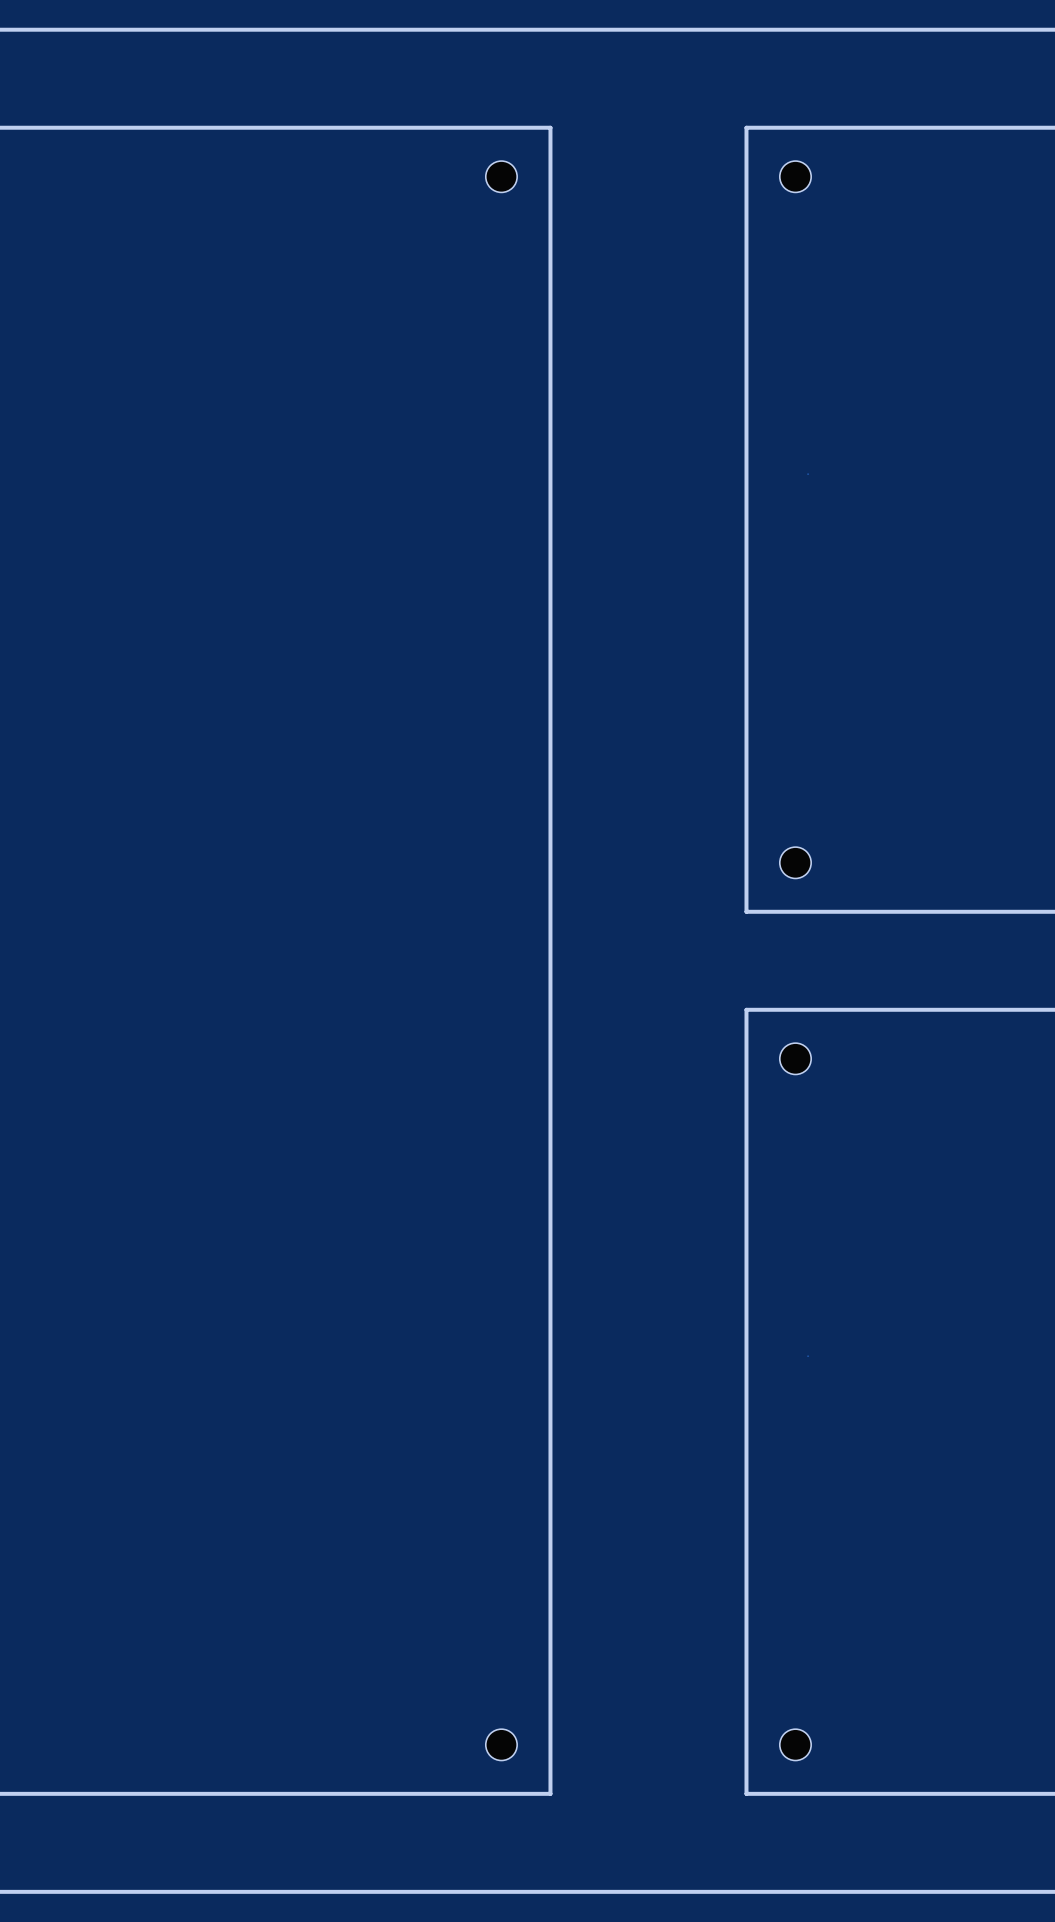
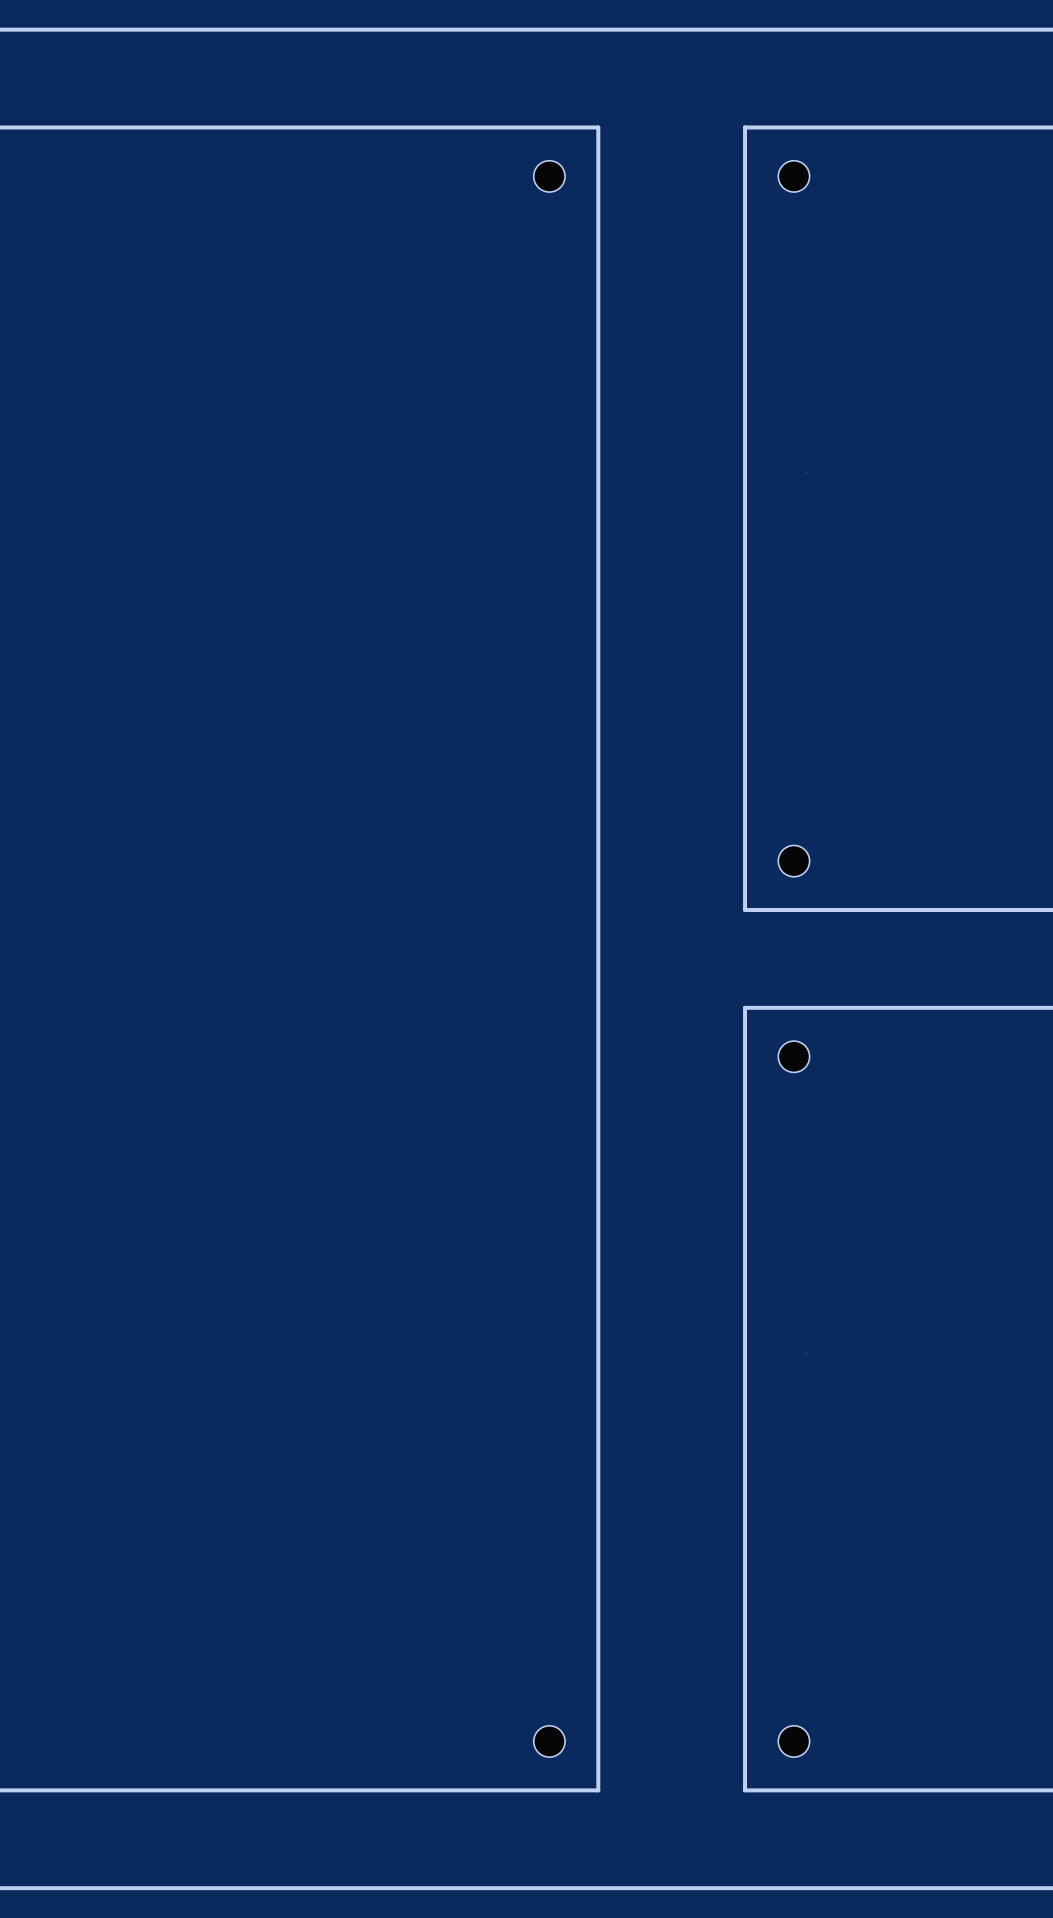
board edge: (550, 127) (550, 1793) -> (549, 127) (598, 127) (598, 1790) (549, 1790)
hole position: (501, 176) -> (549, 176)
hole position: (501, 1744) -> (549, 1741)

